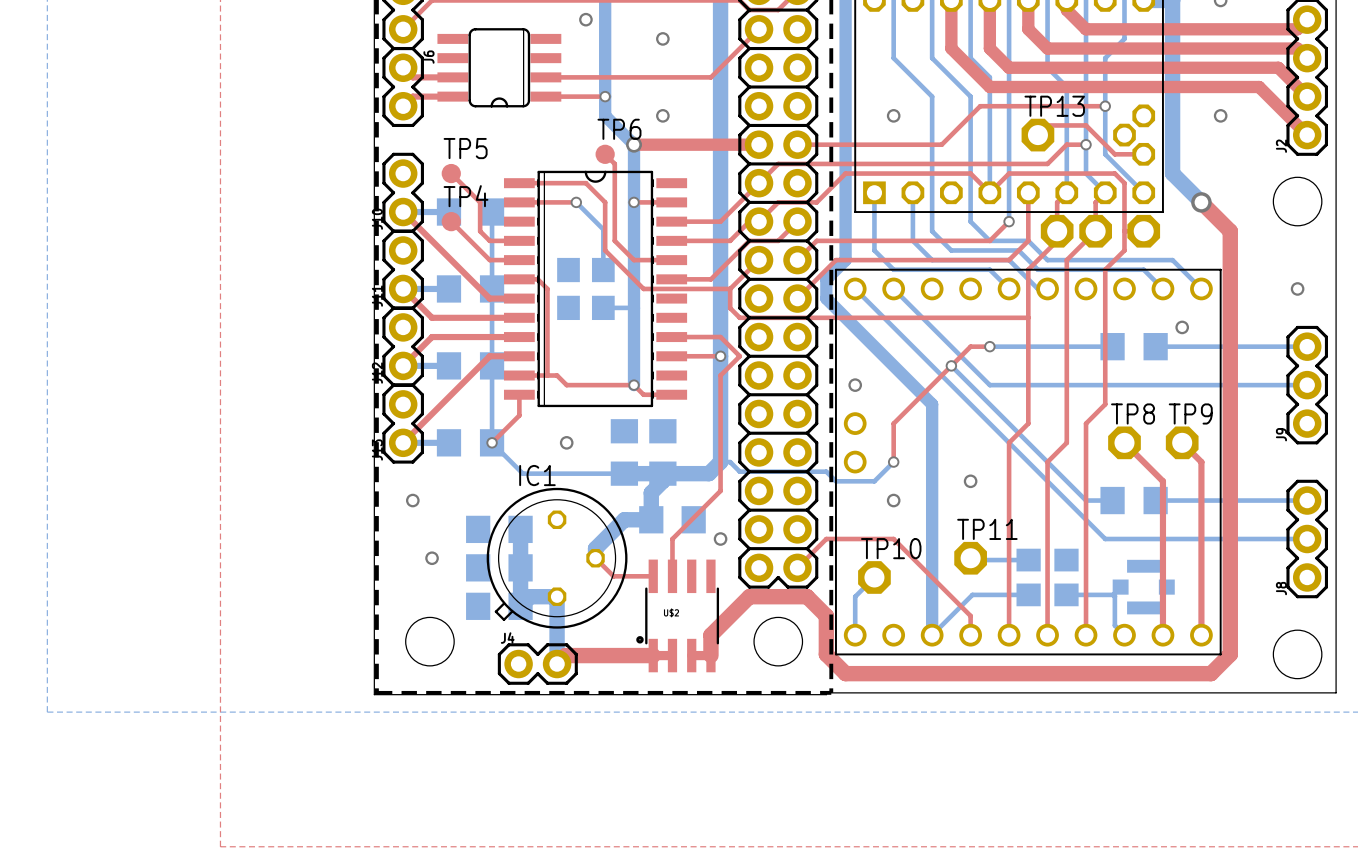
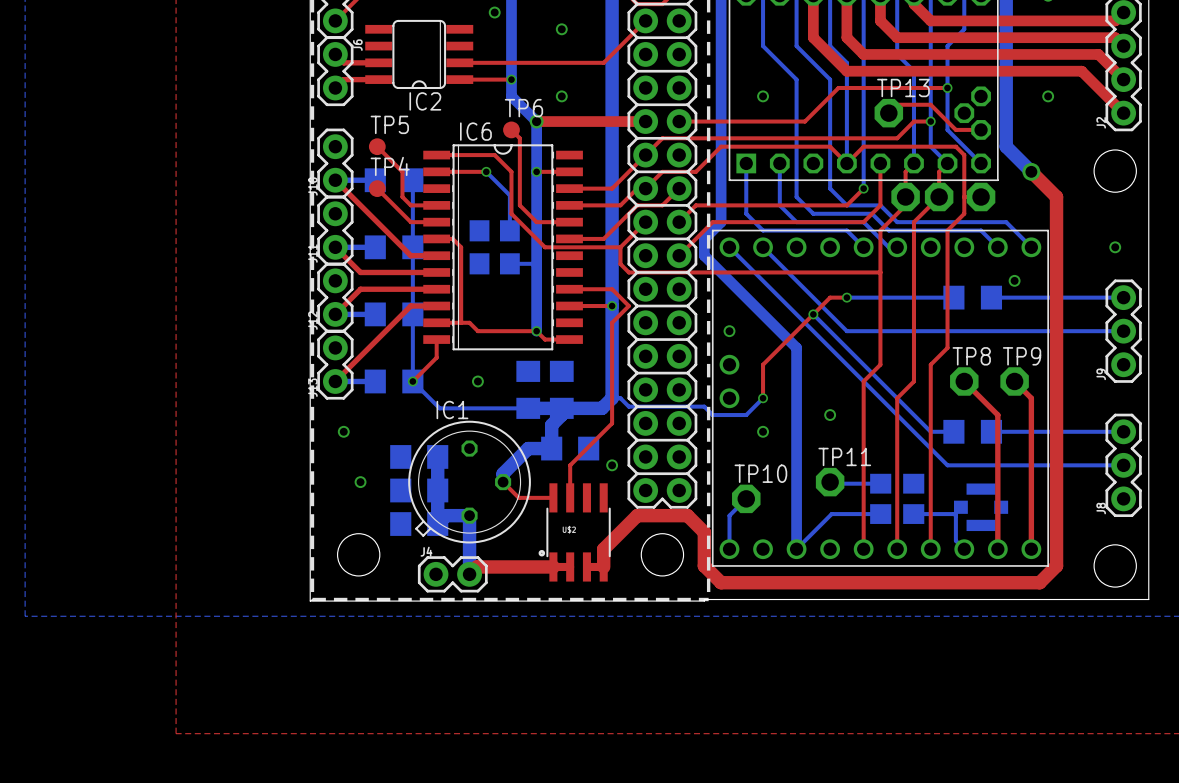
IC2 name: none -> IC2 (425, 101)
IC6 name: none -> IC6 (475, 131)
top track: (797, 567) (826, 539) (893, 539) (970, 615) (970, 635) -> none

